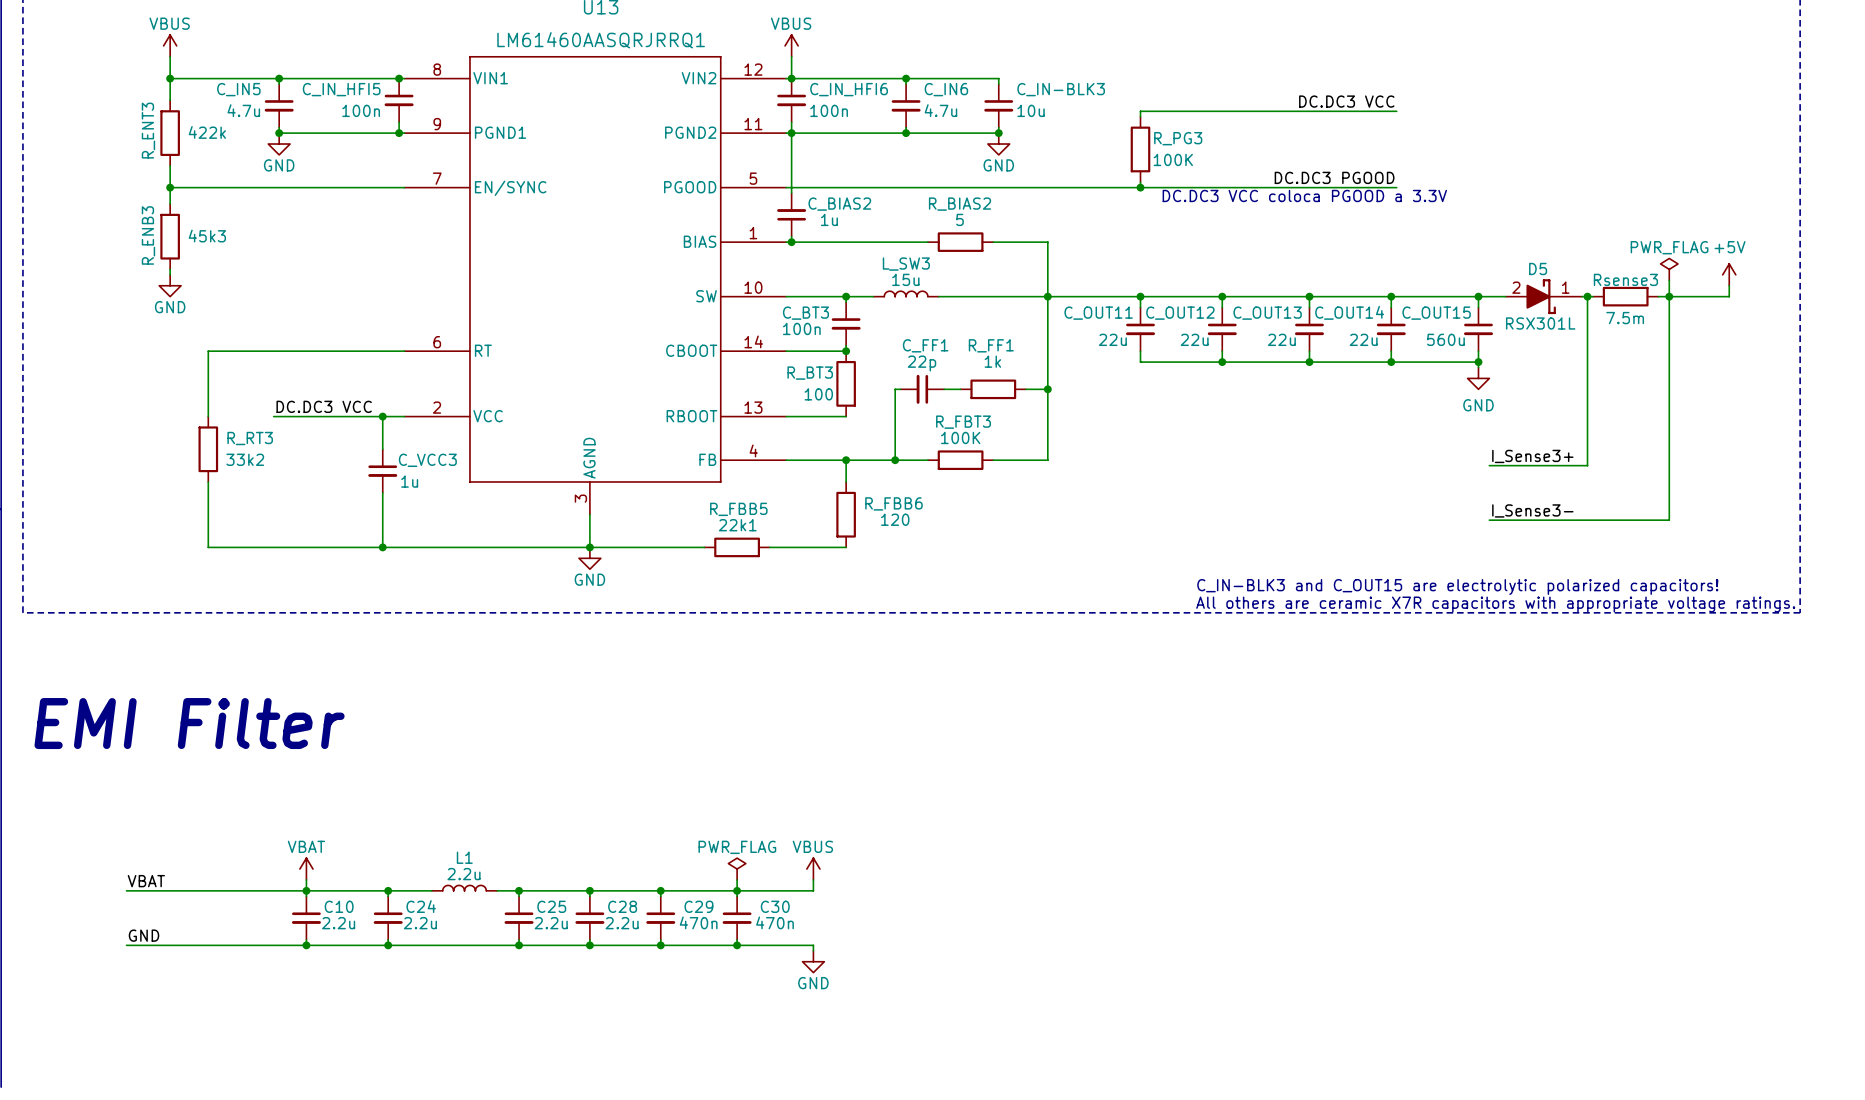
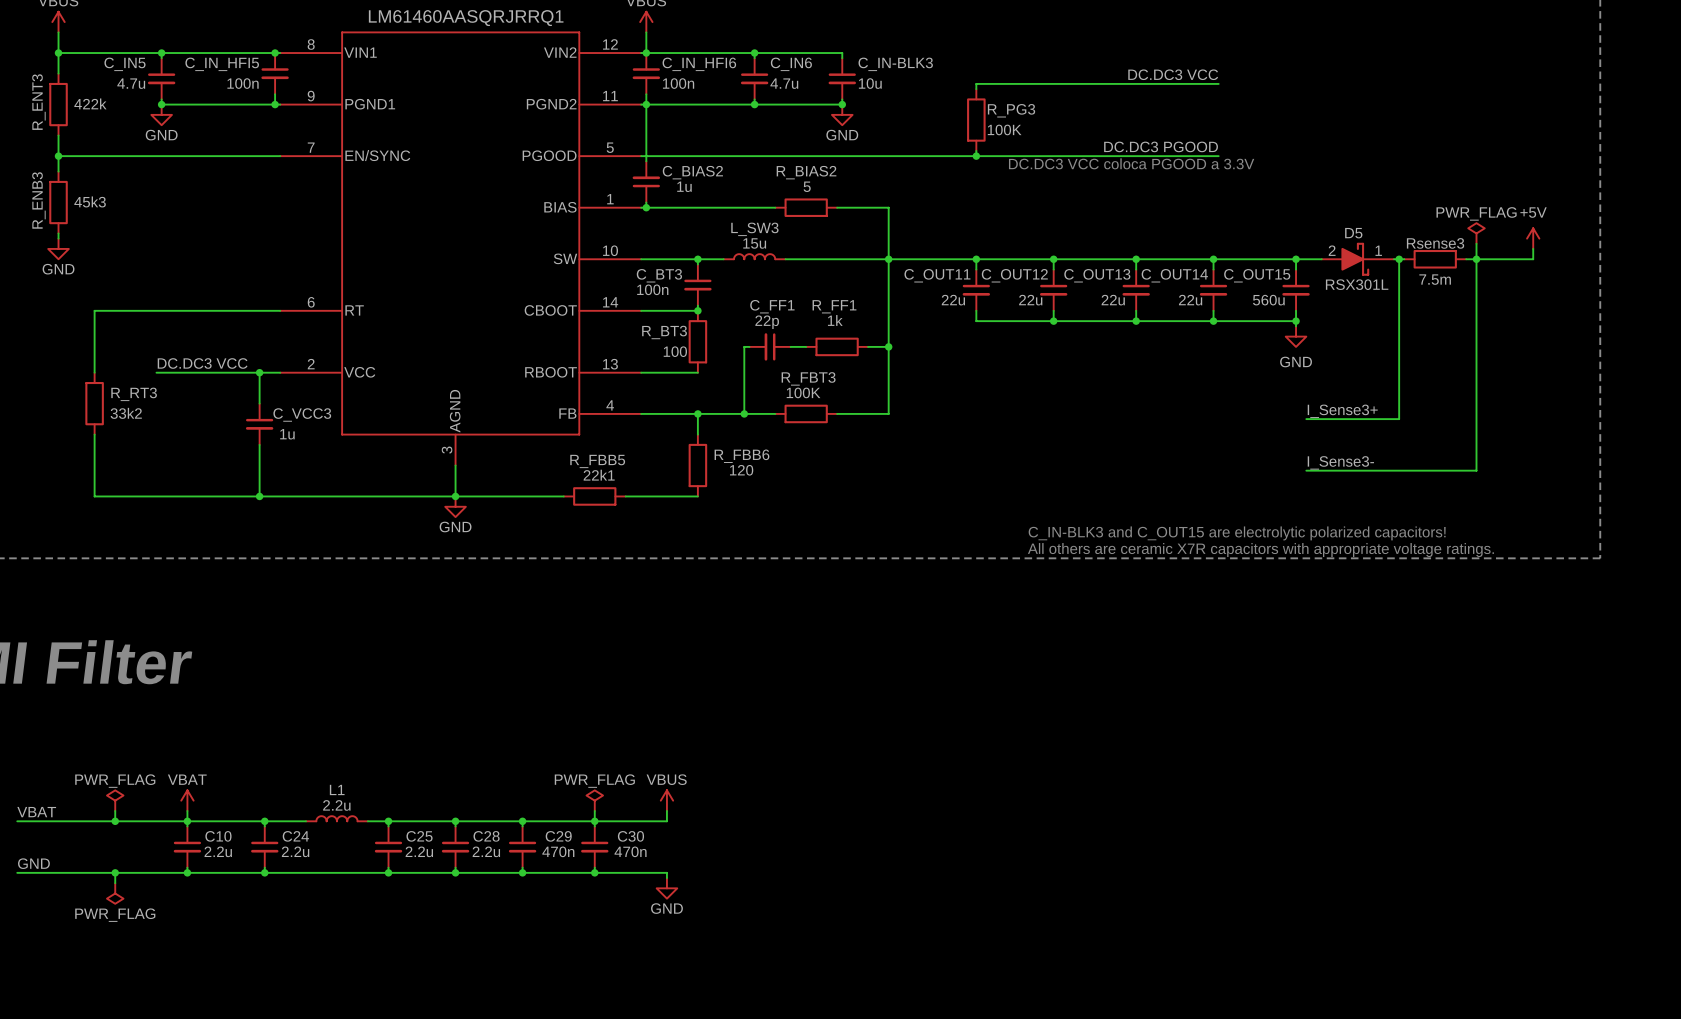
power symbol: none -> PWR_FLAG (115, 800)
wire: none -> (115, 810) (115, 821)
junction: none -> (115, 821)
wire: none -> (115, 872) (115, 883)
junction: none -> (115, 872)
power symbol: none -> PWR_FLAG (115, 893)

